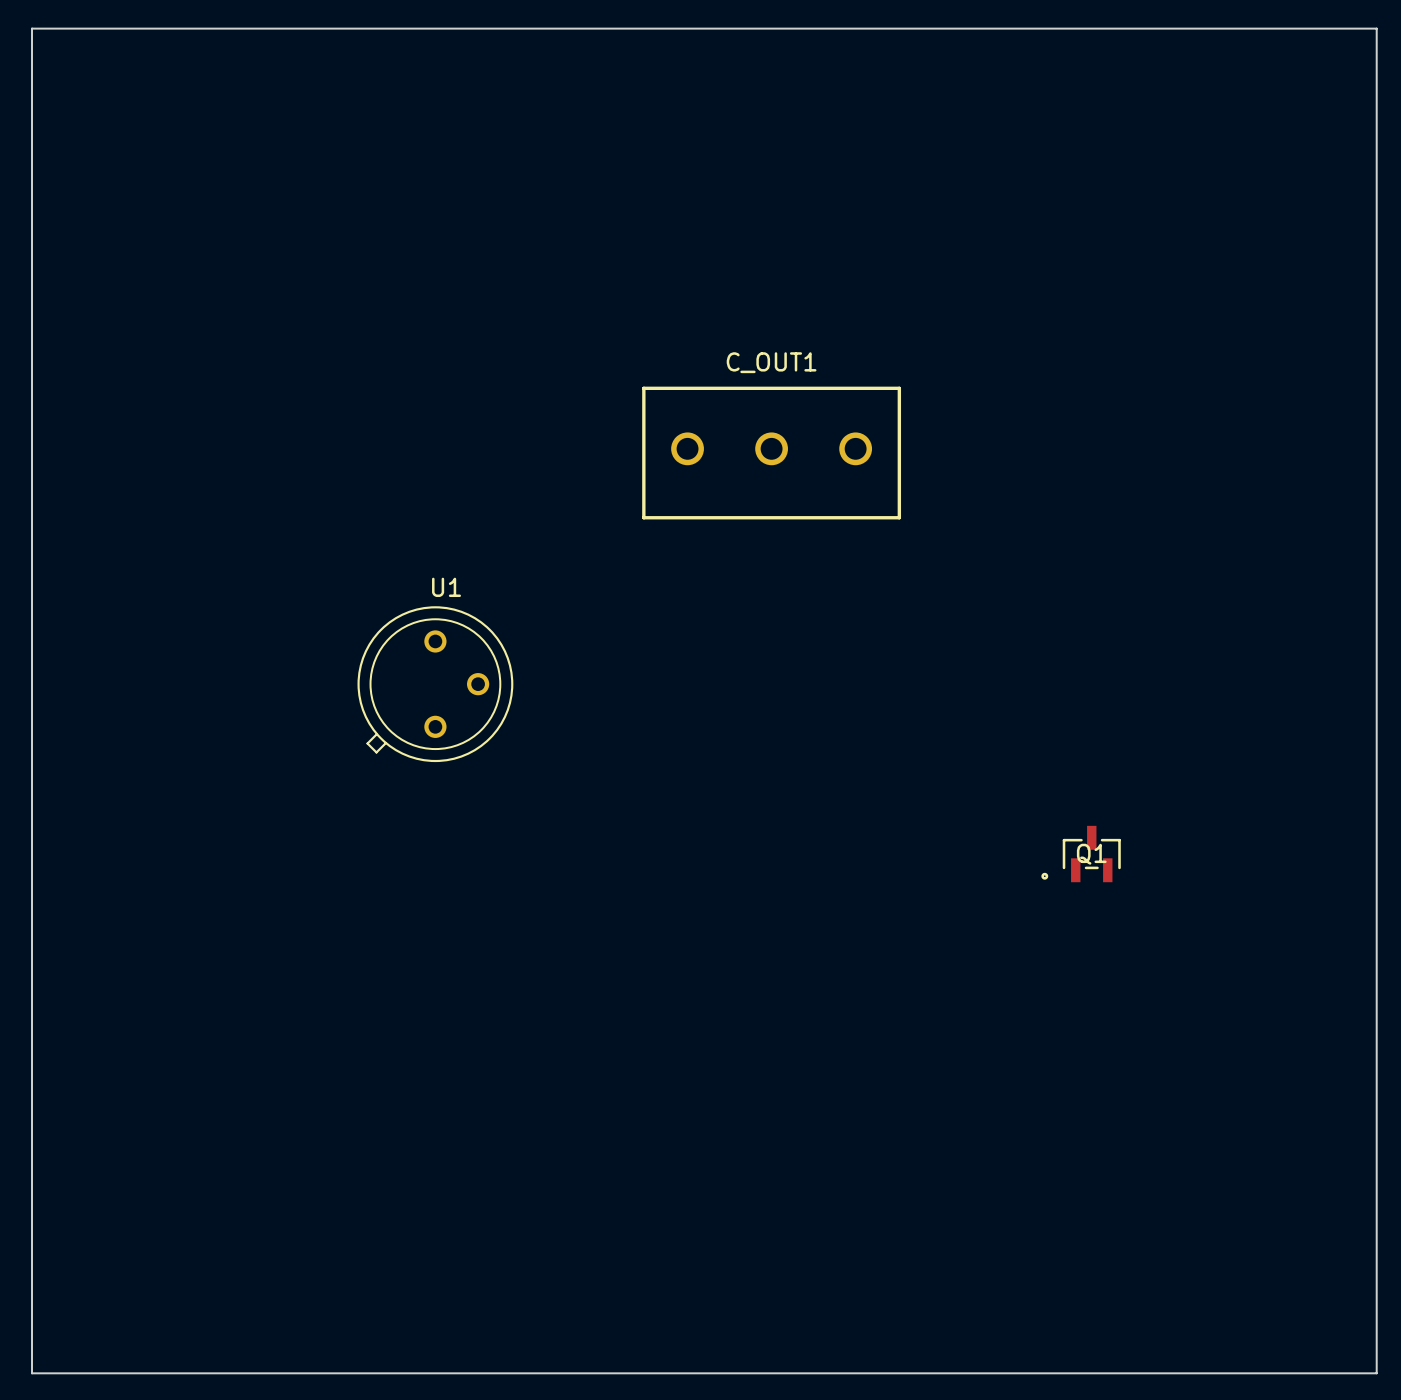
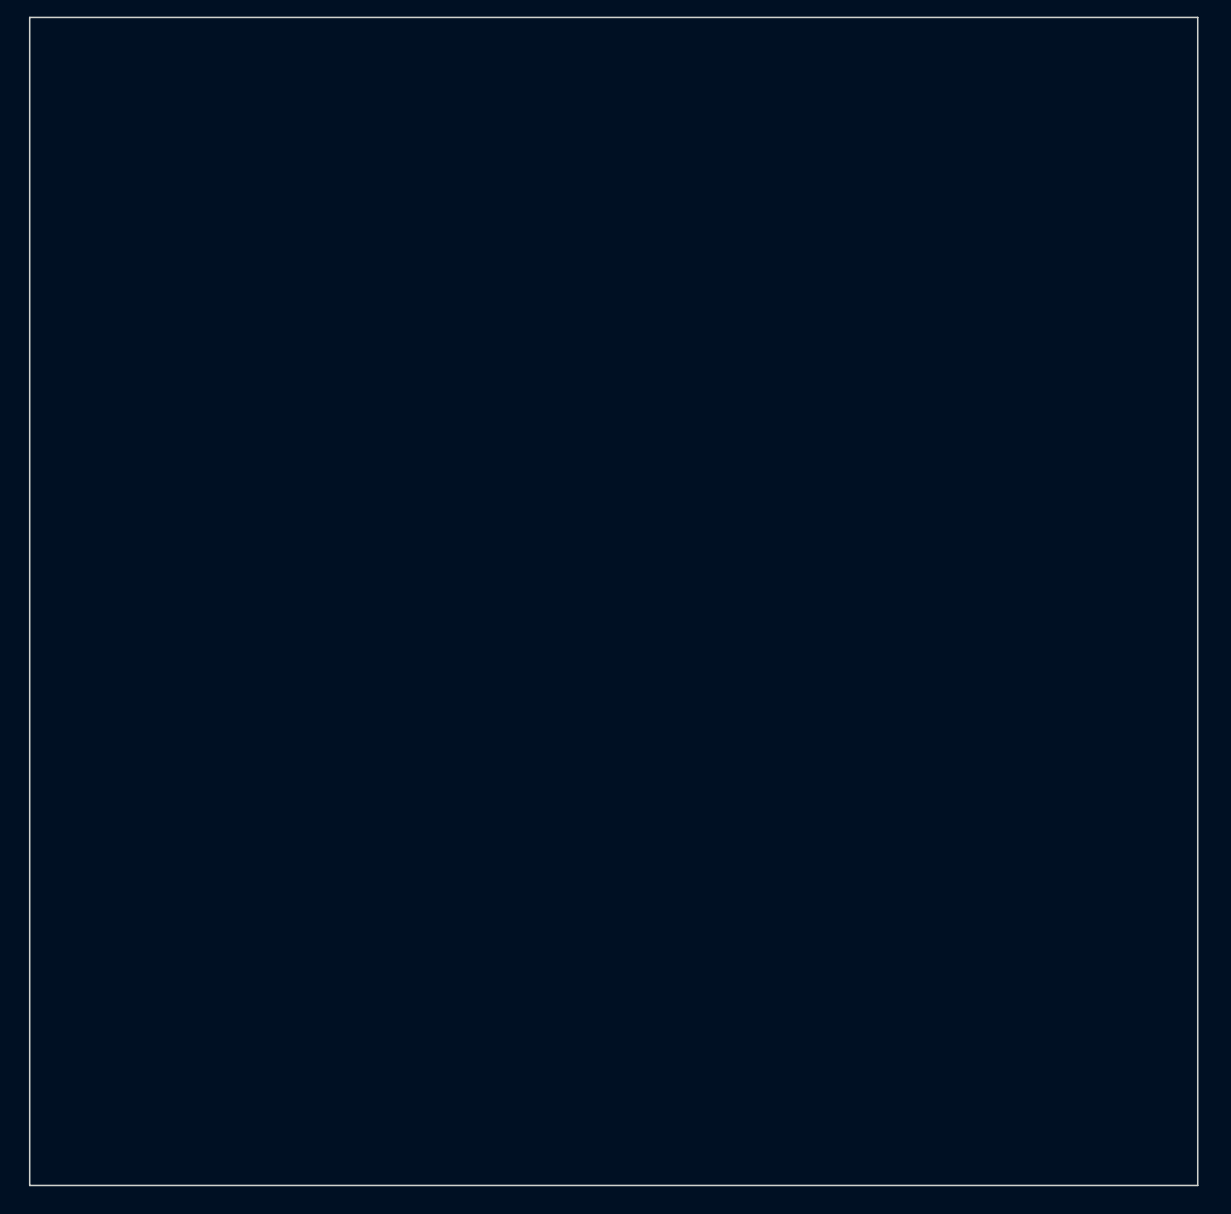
C_OUT1: (771, 453) -> none
U1: (435, 684) -> none
Q1: (1081, 854) -> none

